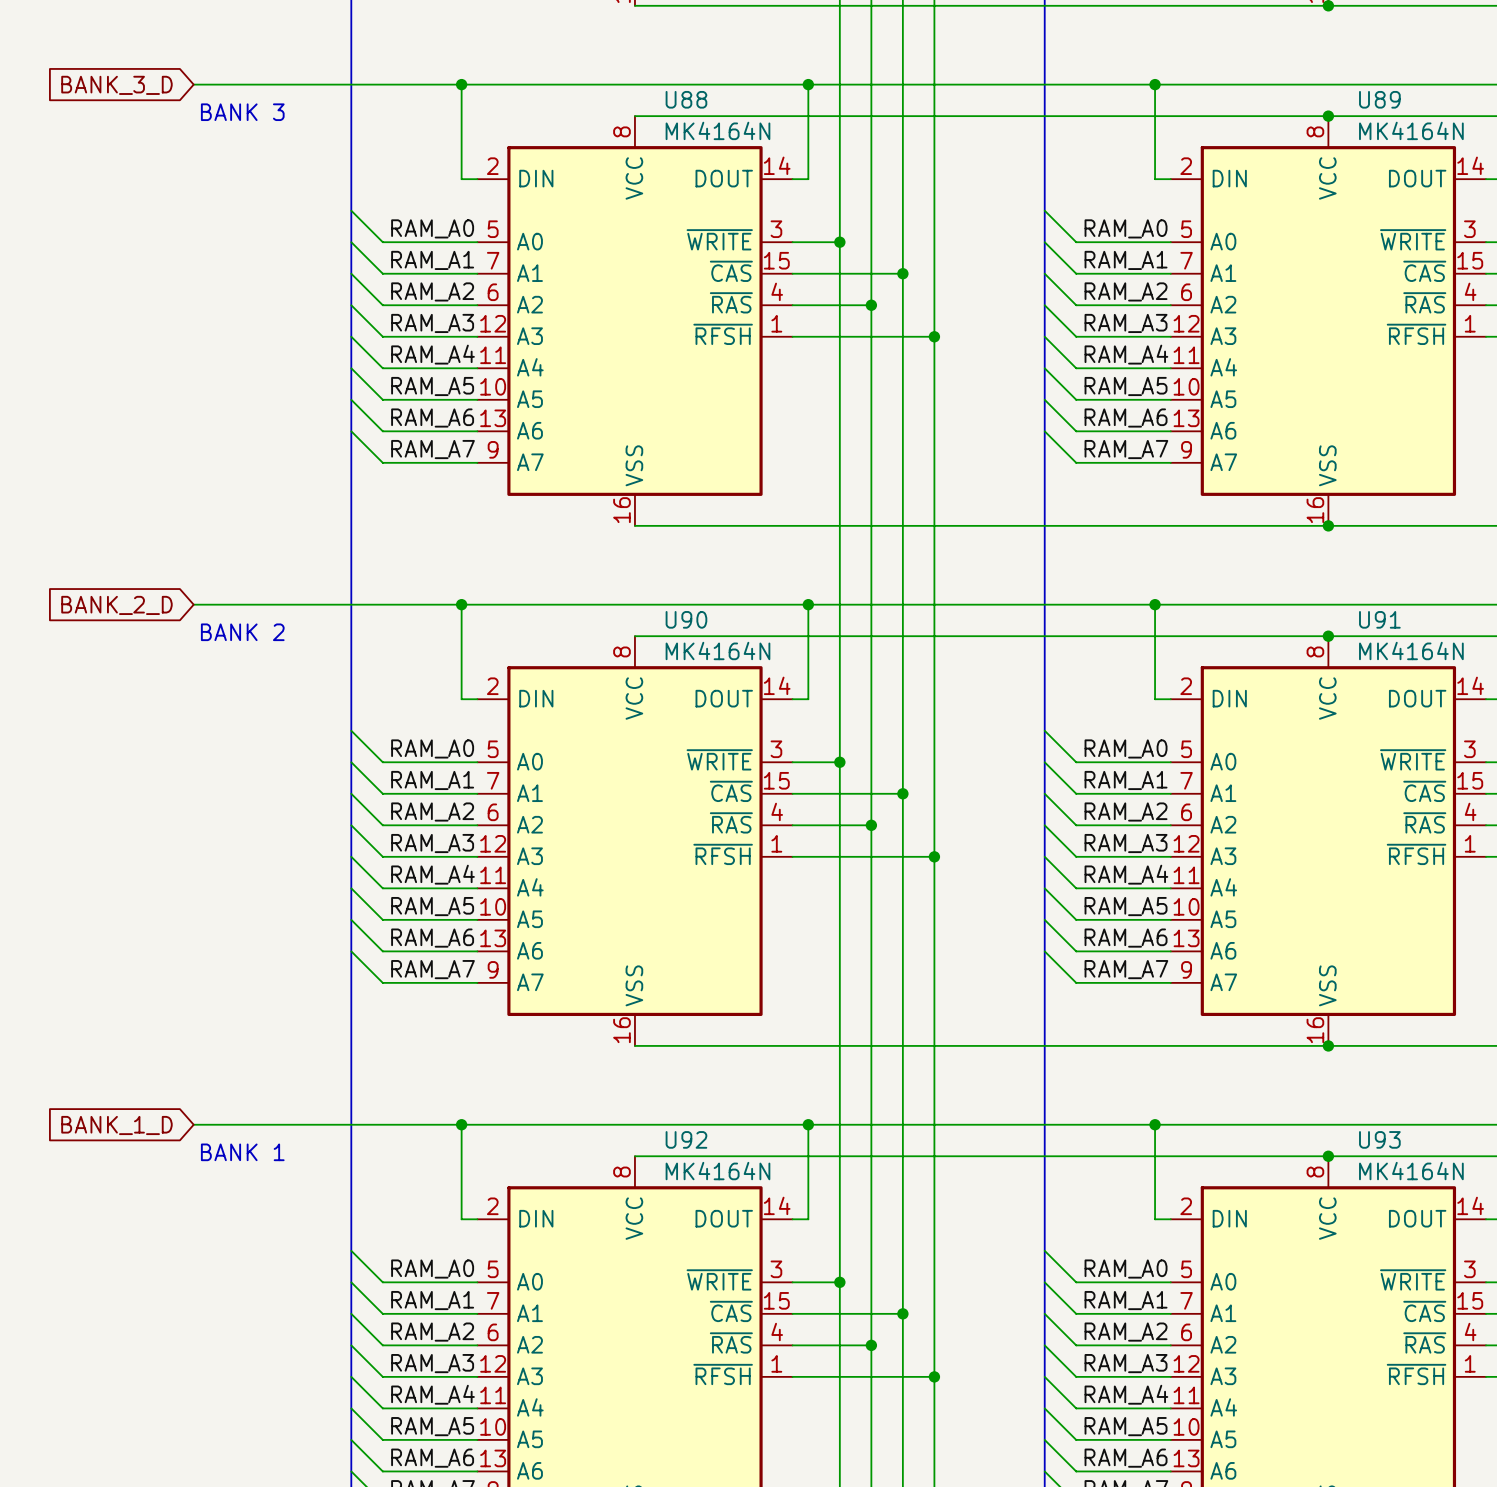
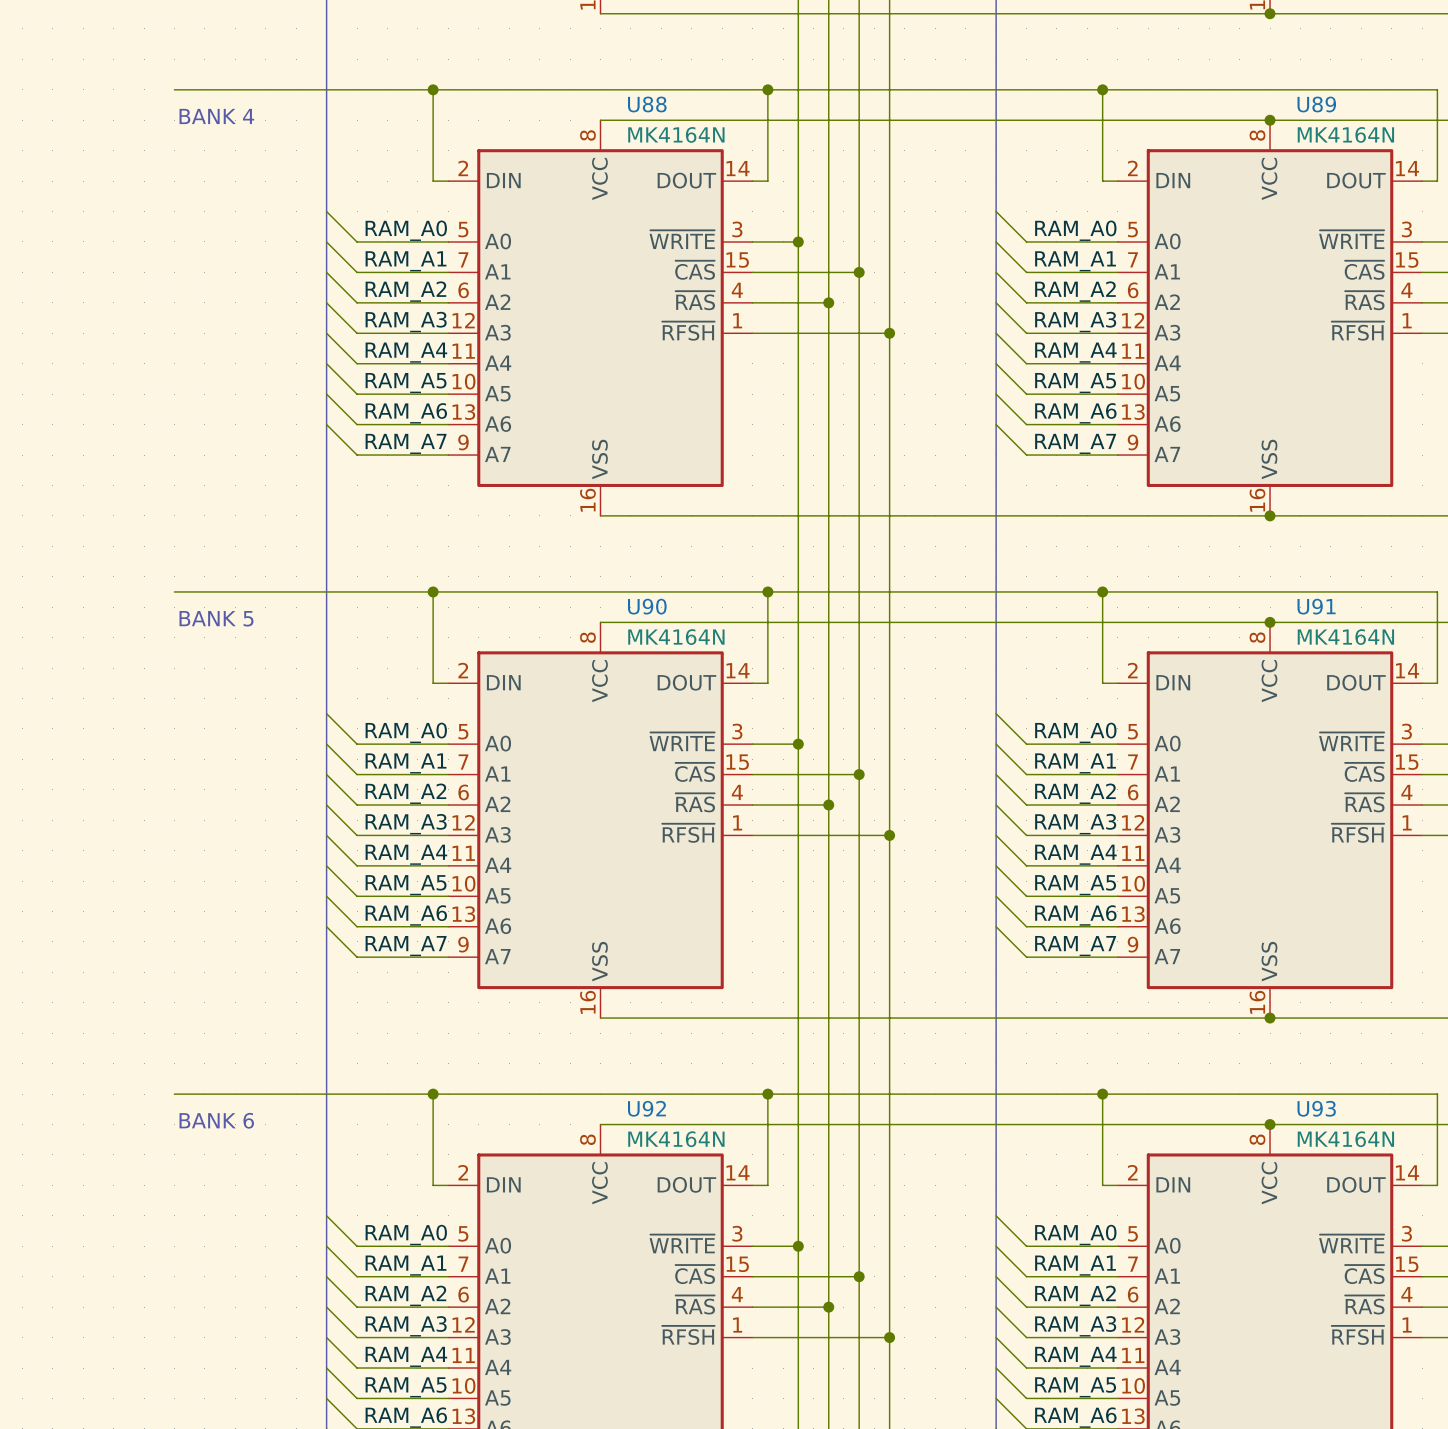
global label: BANK_3_D (116, 85) -> none
text: BANK 3 (242, 112) -> BANK 4 (216, 116)
global label: BANK_2_D (116, 605) -> none
text: BANK 2 (242, 632) -> BANK 5 (216, 618)
global label: BANK_1_D (116, 1125) -> none
text: BANK 1 (242, 1152) -> BANK 6 (216, 1120)

